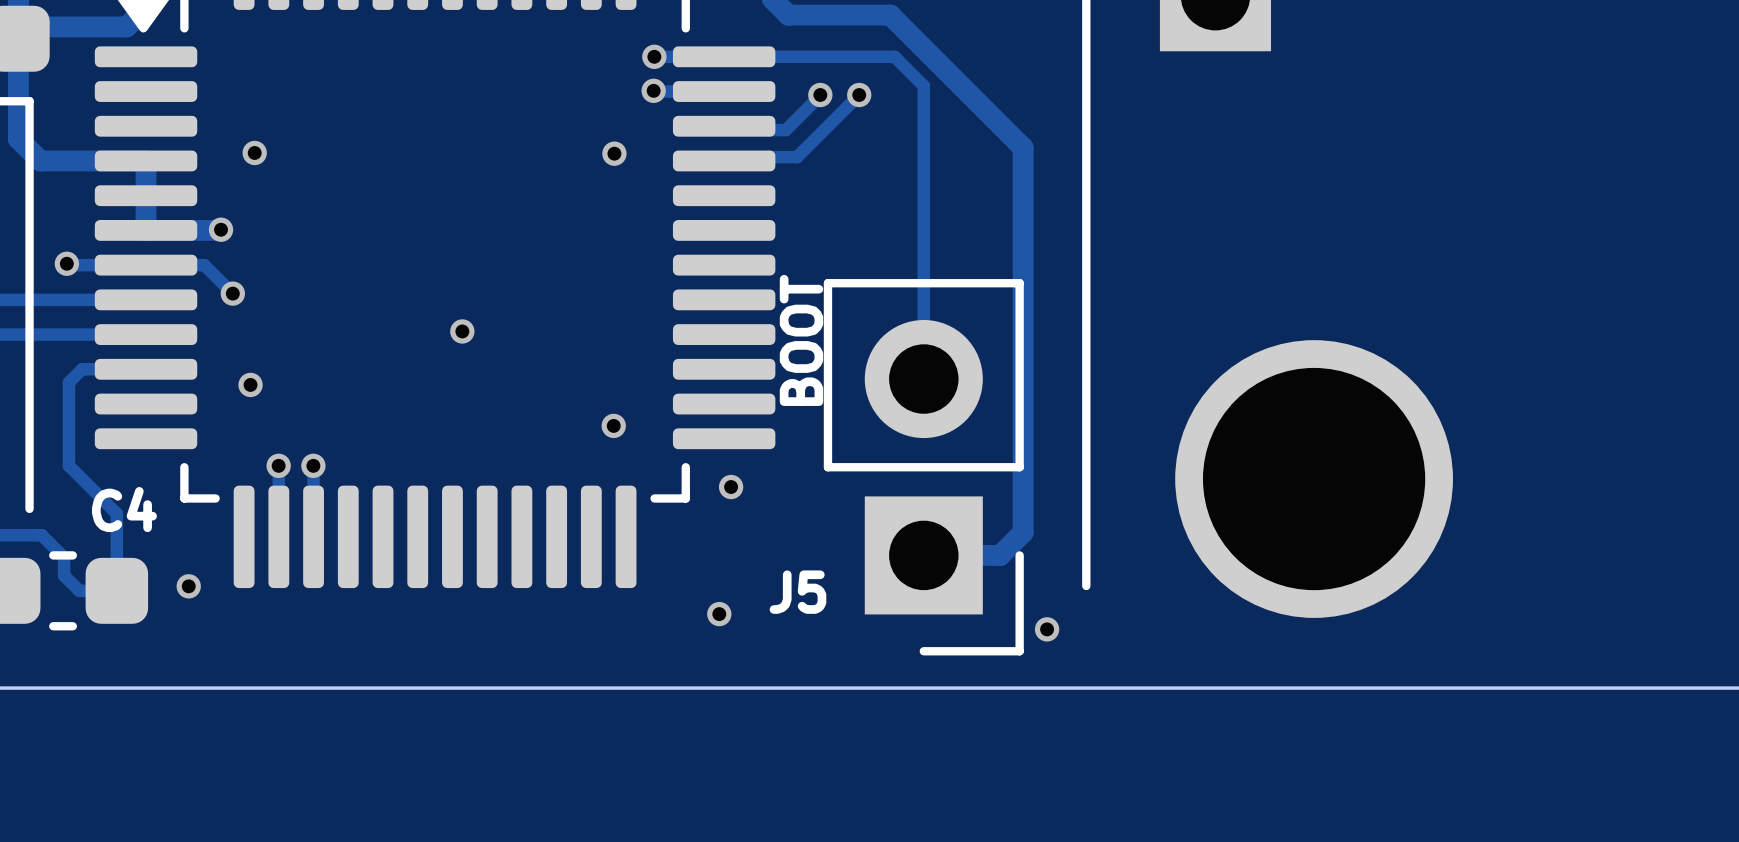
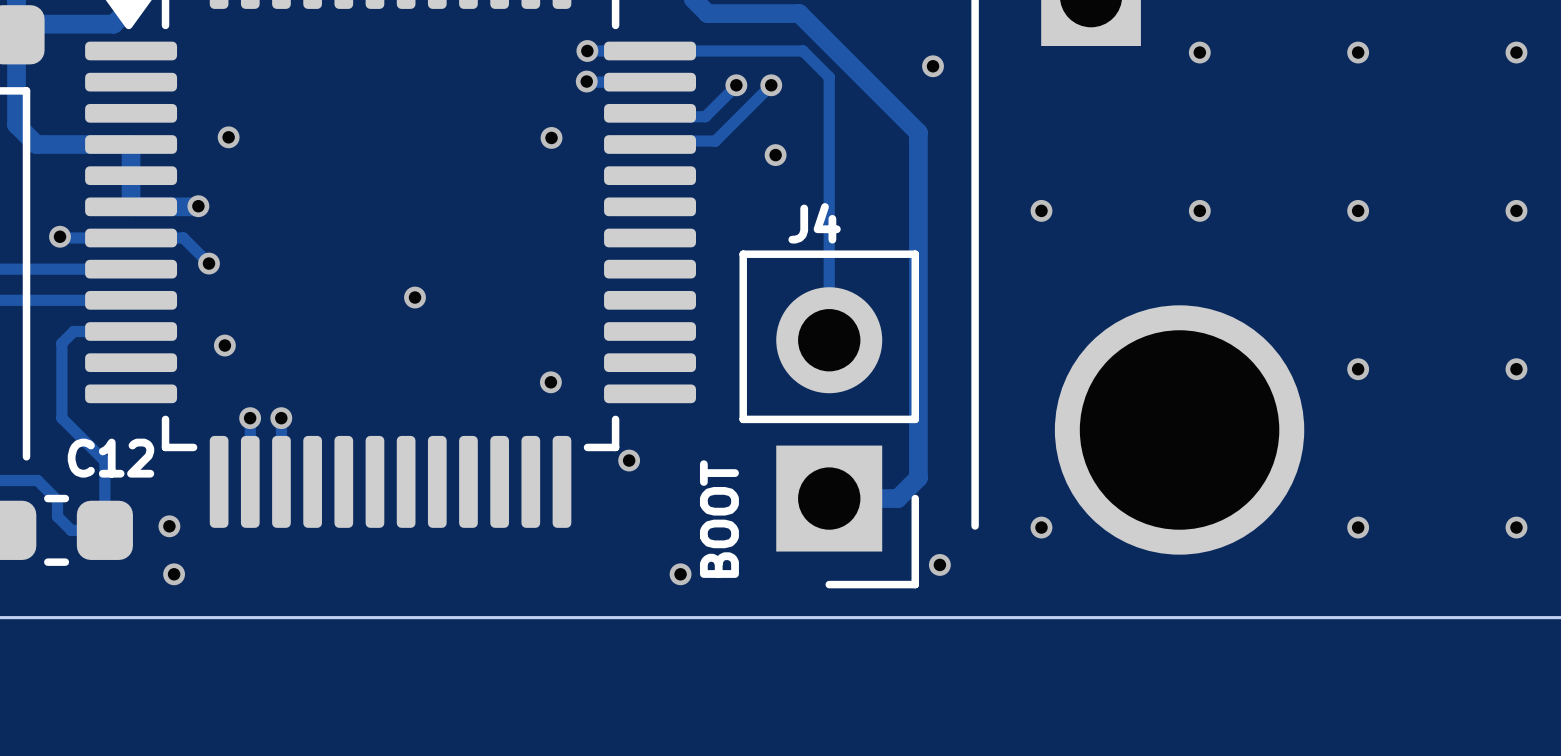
via: none -> (1199, 52)
via: none -> (1358, 52)
via: none -> (1516, 52)
via: none -> (933, 66)
via: none -> (775, 155)
via: none -> (1041, 210)
via: none -> (1199, 210)
via: none -> (1358, 210)
via: none -> (1516, 210)
text position: BOOT (801, 340) -> BOOT (719, 519)
via: none -> (1358, 369)
via: none -> (1516, 369)
via position: (731, 487) -> (629, 460)
C4 name: C4 (124, 509) -> C12 (110, 458)
via: none -> (1041, 527)
via: none -> (1358, 527)
via: none -> (1516, 527)
J5 name: J5 (797, 592) -> J4 (814, 223)
via position: (719, 614) -> (680, 574)
via: none -> (174, 574)

